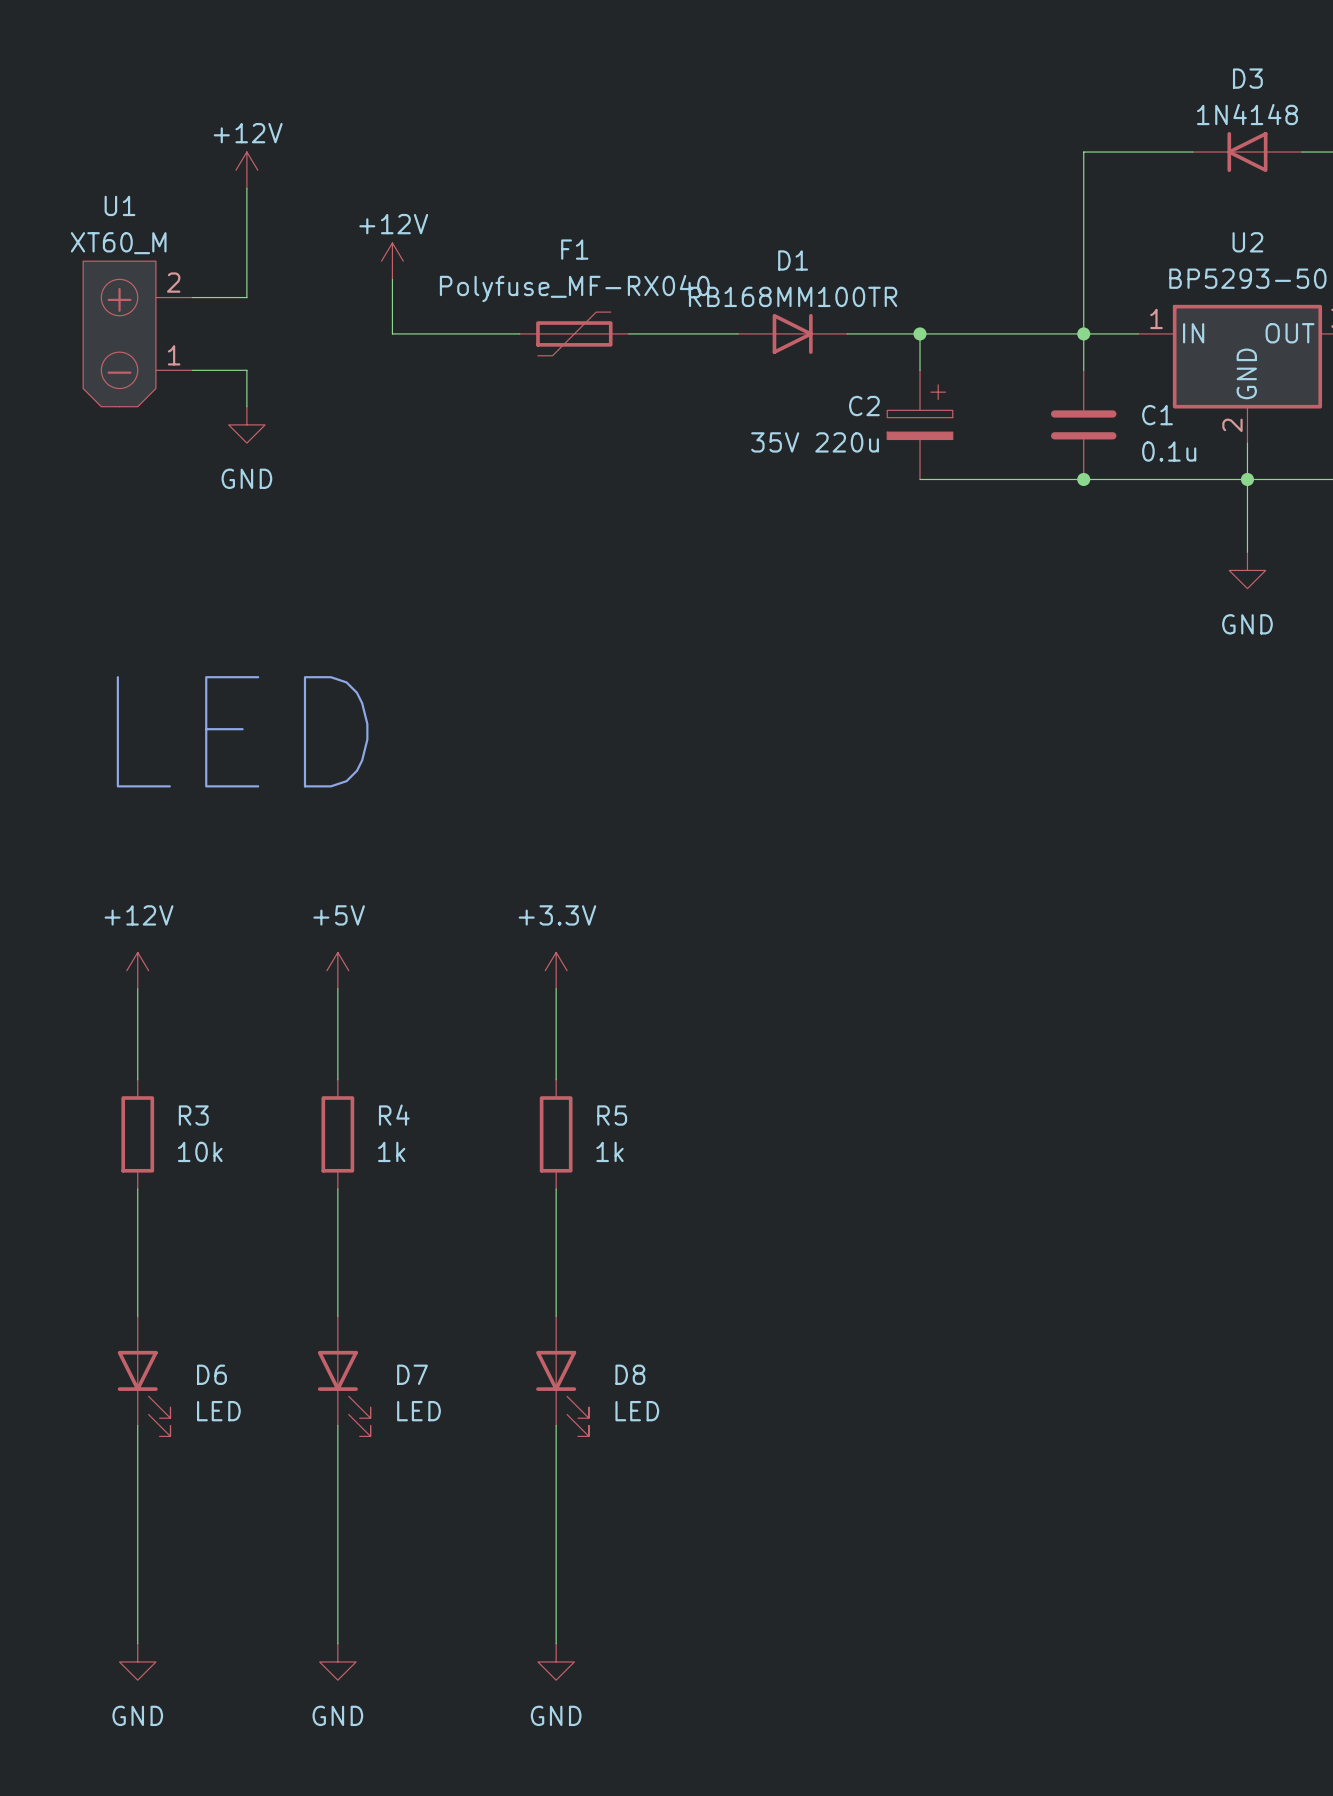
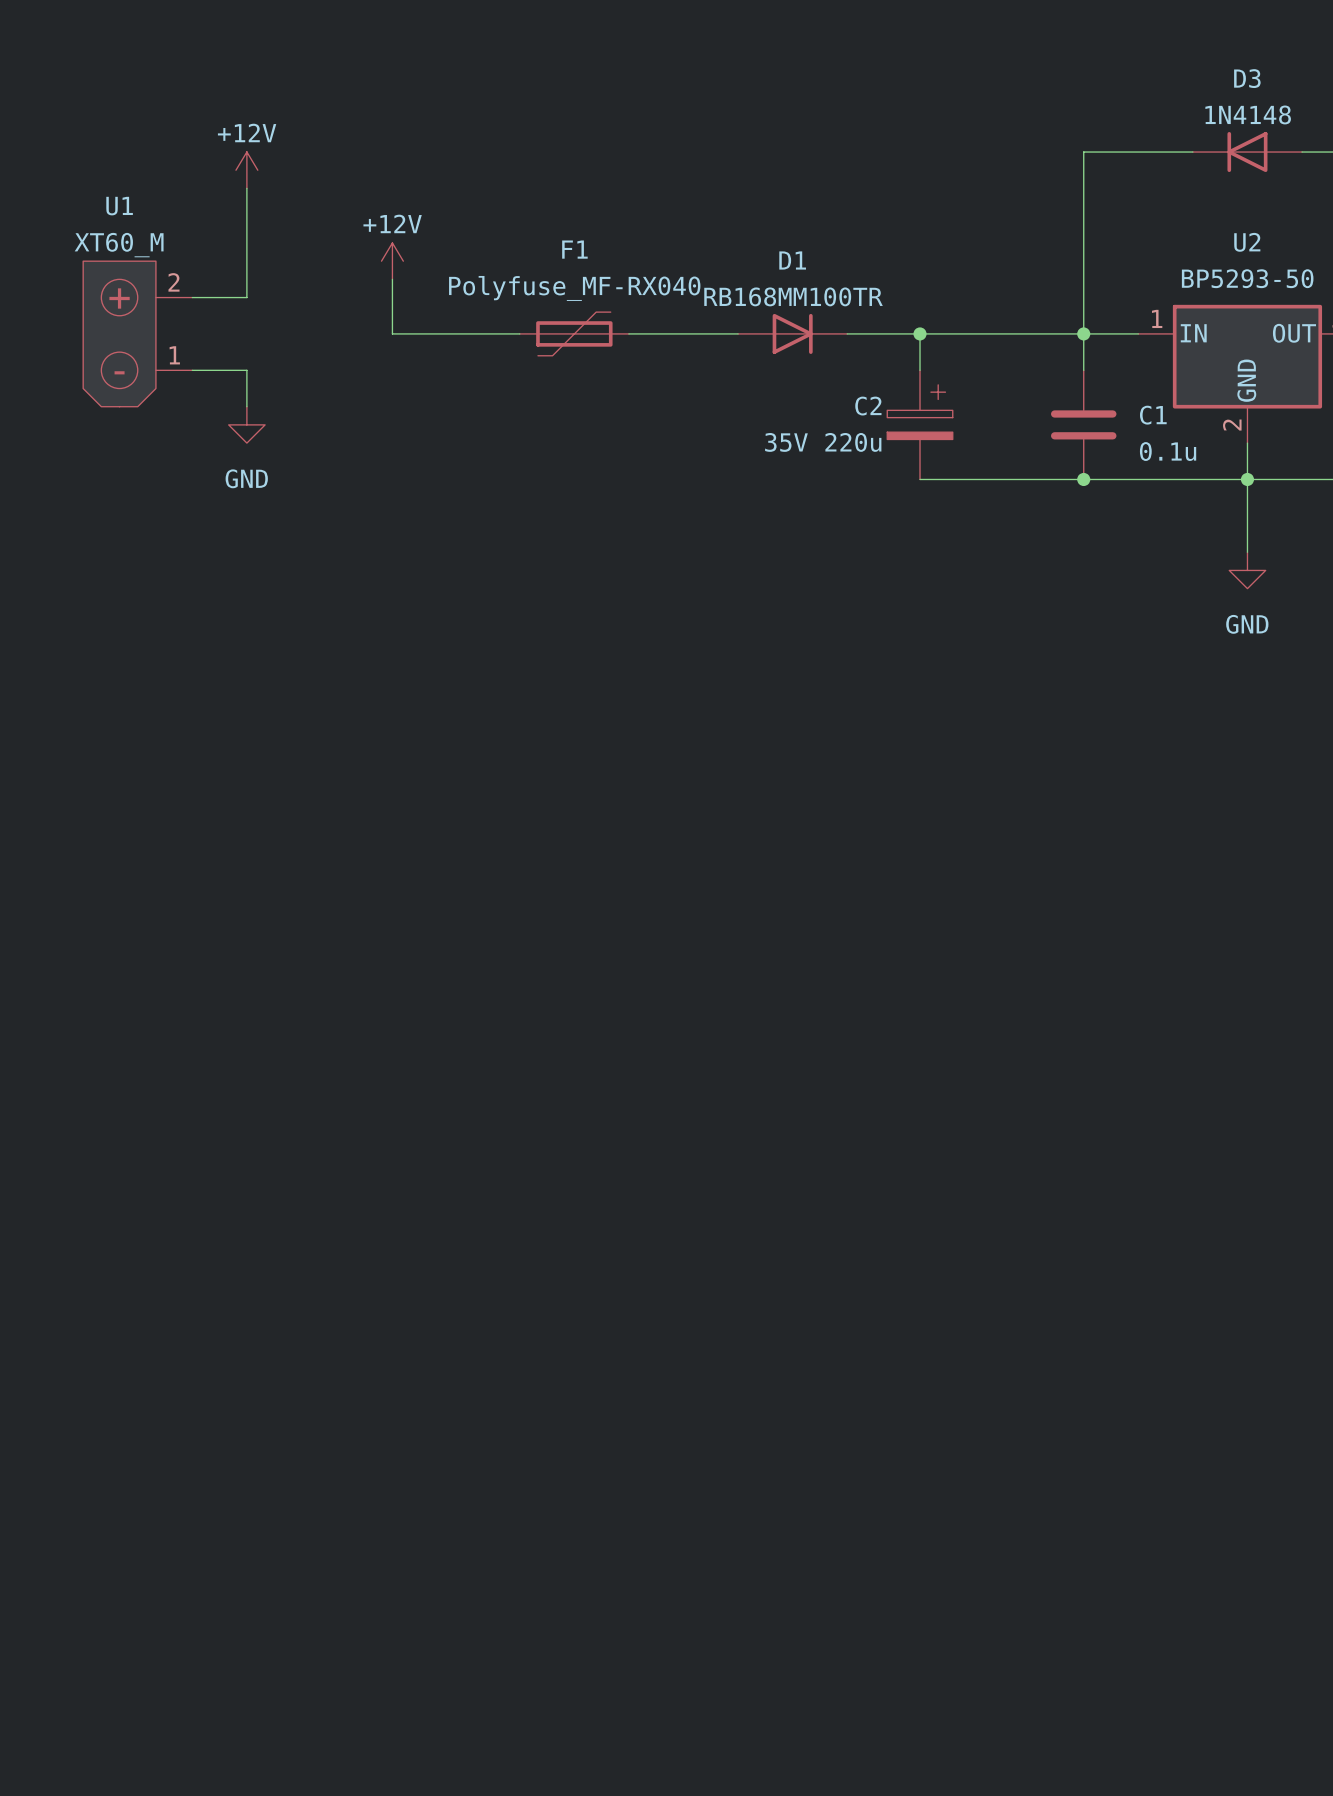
text: LED (242, 731) -> none
power symbol: +12V (137, 970) -> none
power symbol: +5V (337, 970) -> none
power symbol: +3.3V (556, 970) -> none
wire: (137, 988) (137, 1079) -> none
wire: (337, 988) (337, 1079) -> none
wire: (556, 988) (556, 1079) -> none
R3: 10k (137, 1134) -> none
R4: 1k (337, 1134) -> none
R5: 1k (556, 1134) -> none
wire: (137, 1188) (137, 1316) -> none
wire: (337, 1188) (337, 1316) -> none
wire: (556, 1188) (556, 1316) -> none
D6: LED (144, 1376) -> none
D7: LED (344, 1376) -> none
D8: LED (562, 1376) -> none
wire: (137, 1425) (137, 1643) -> none
wire: (337, 1425) (337, 1643) -> none
wire: (556, 1425) (556, 1643) -> none
power symbol: GND (137, 1661) -> none
power symbol: GND (337, 1661) -> none
power symbol: GND (556, 1661) -> none

